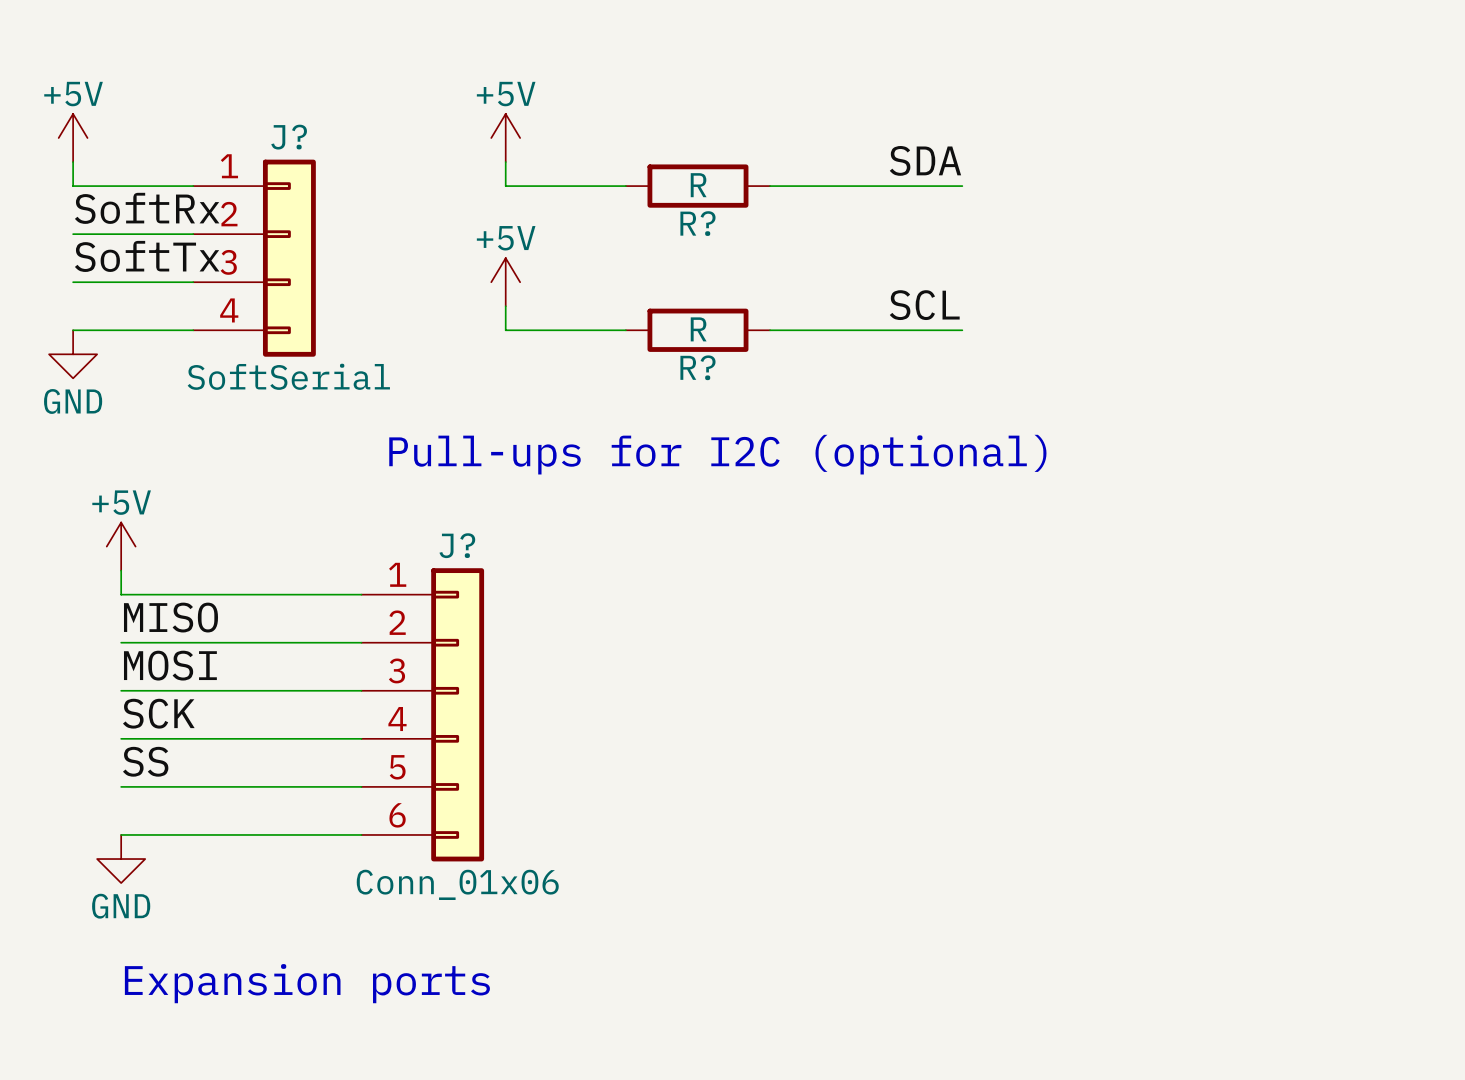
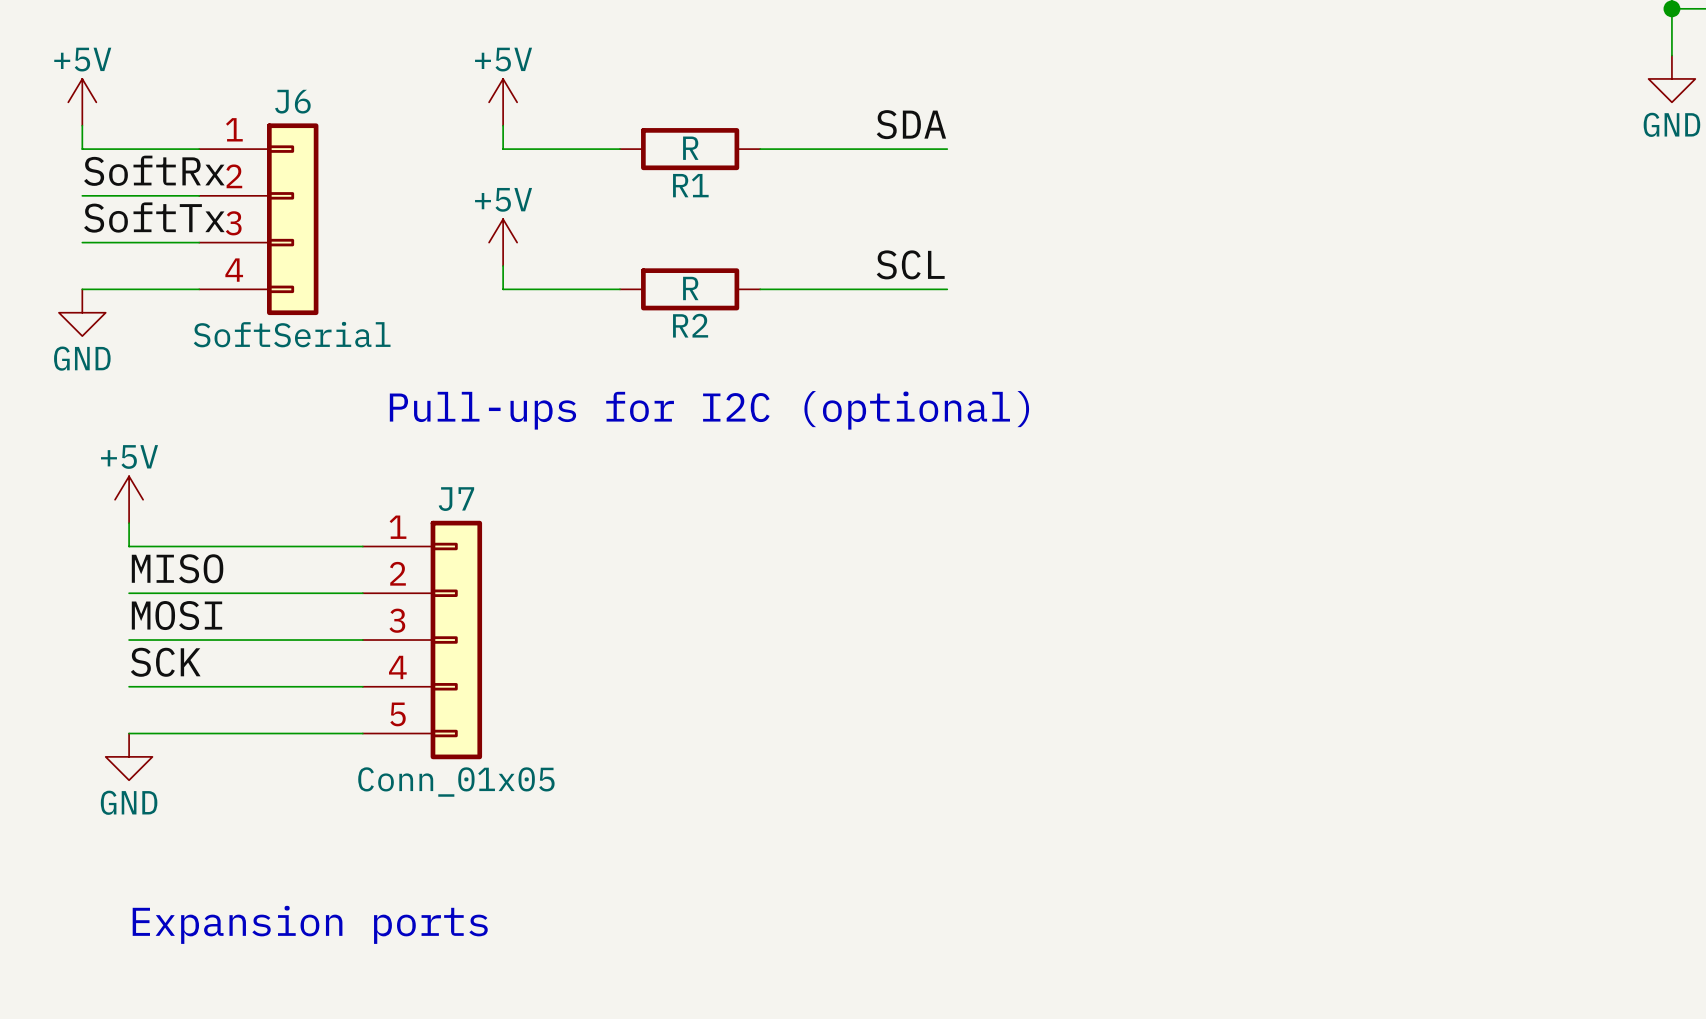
J? name: J? (289, 137) -> J6 (292, 101)
R? name: R? (697, 223) -> R1 (690, 185)
R? name: R? (697, 367) -> R2 (690, 325)
J7: none -> Conn_01x05 (422, 640)
J?: Conn_01x06 (422, 714) -> none
label: SS (145, 761) -> none
wire: (121, 834) (361, 834) -> none
power symbol position: GND (121, 859) -> GND (129, 756)

